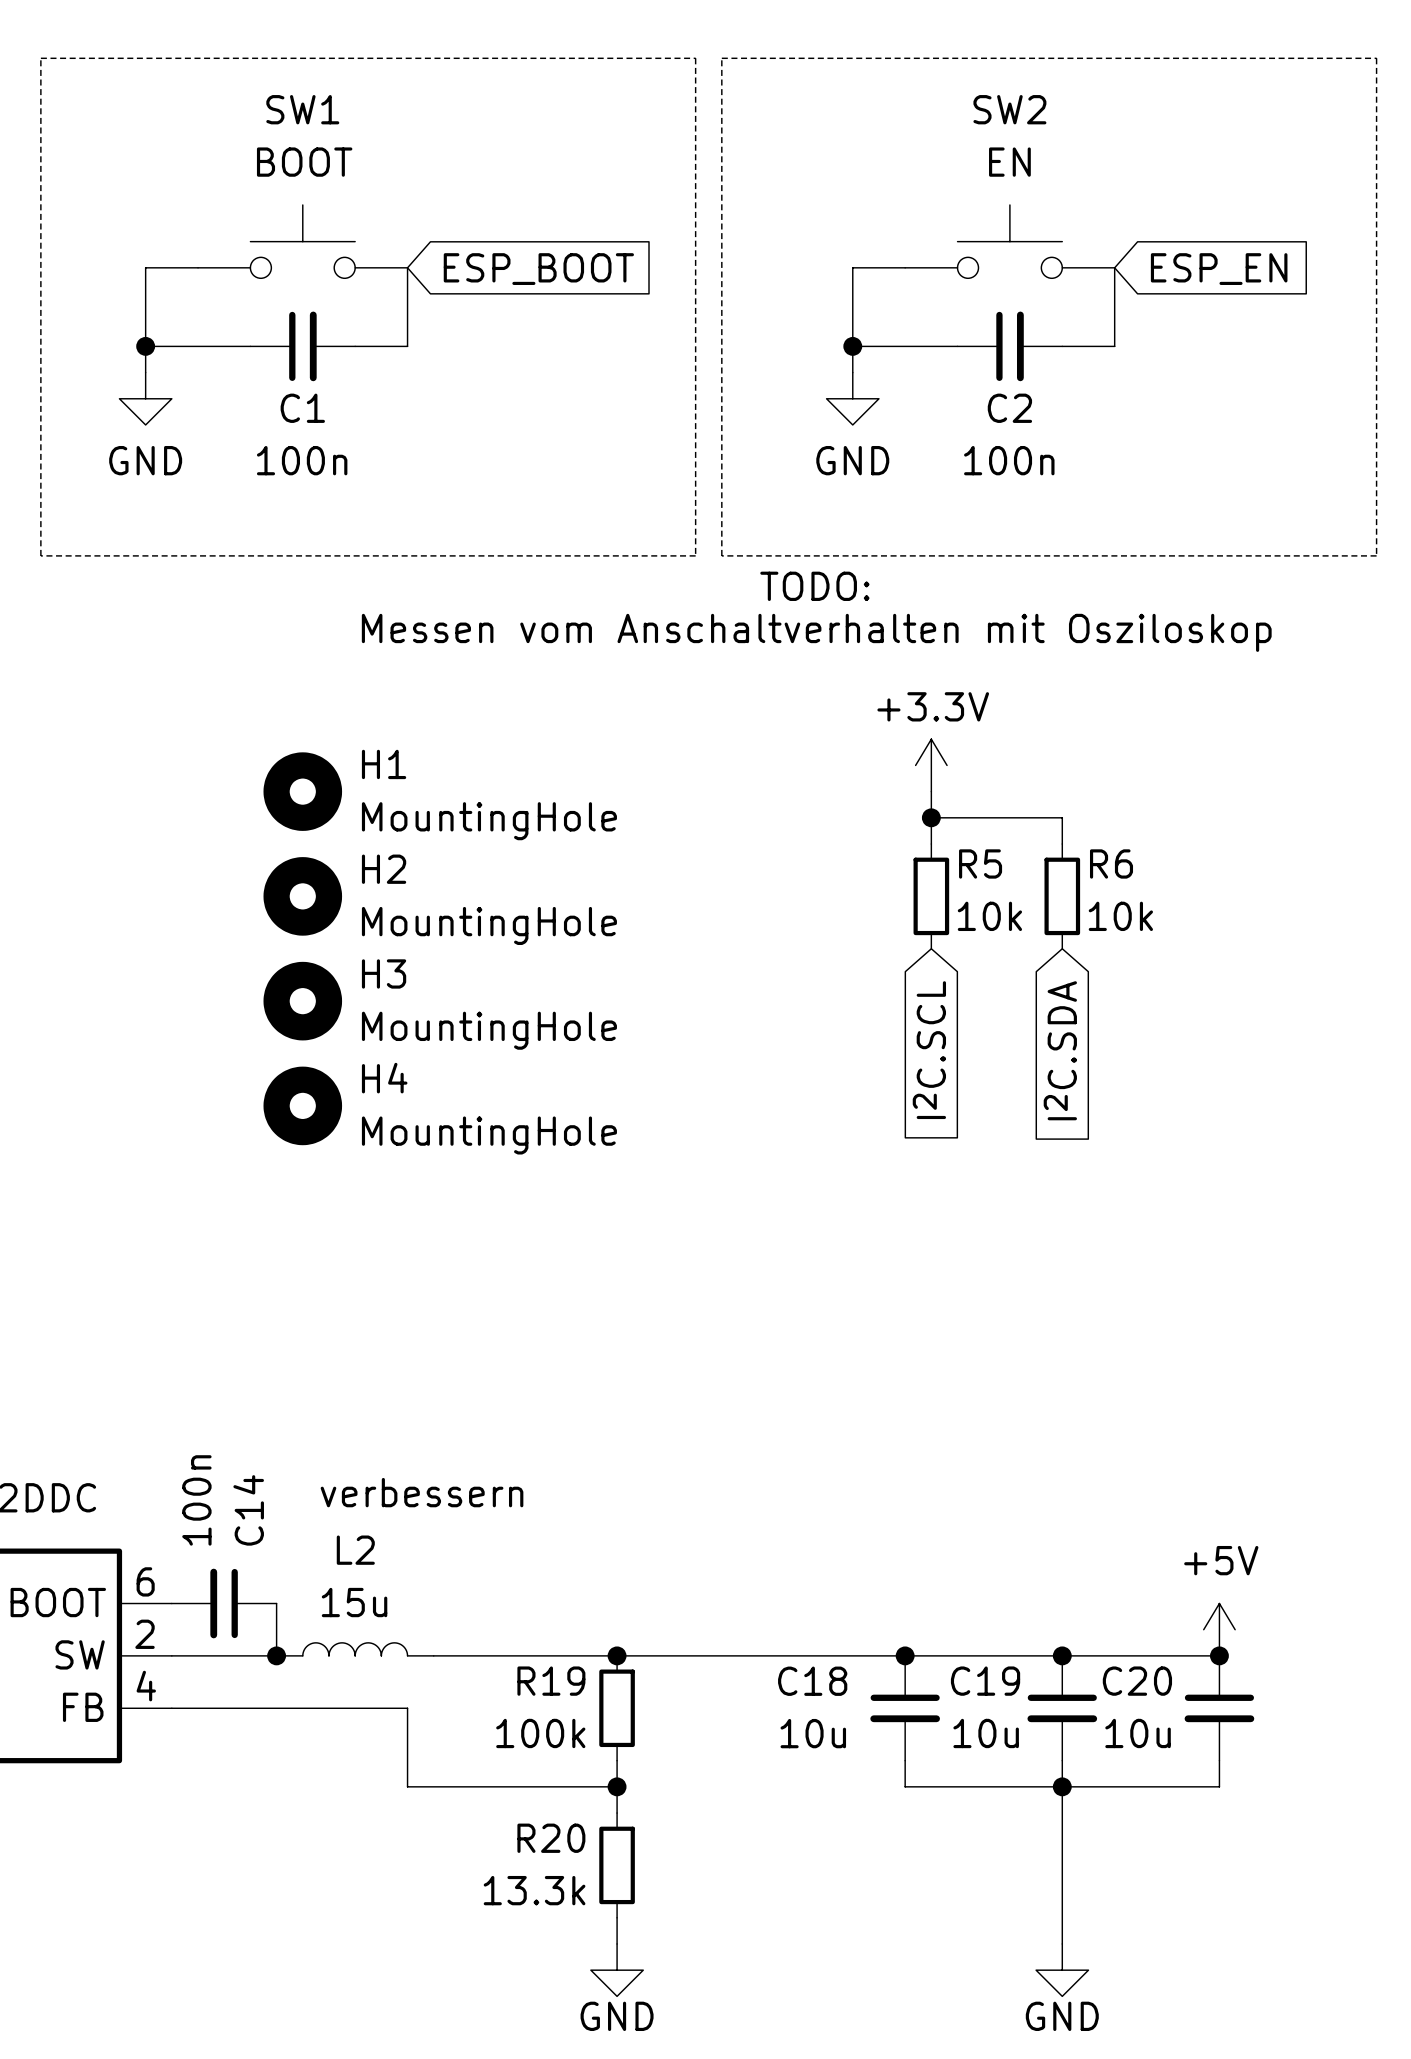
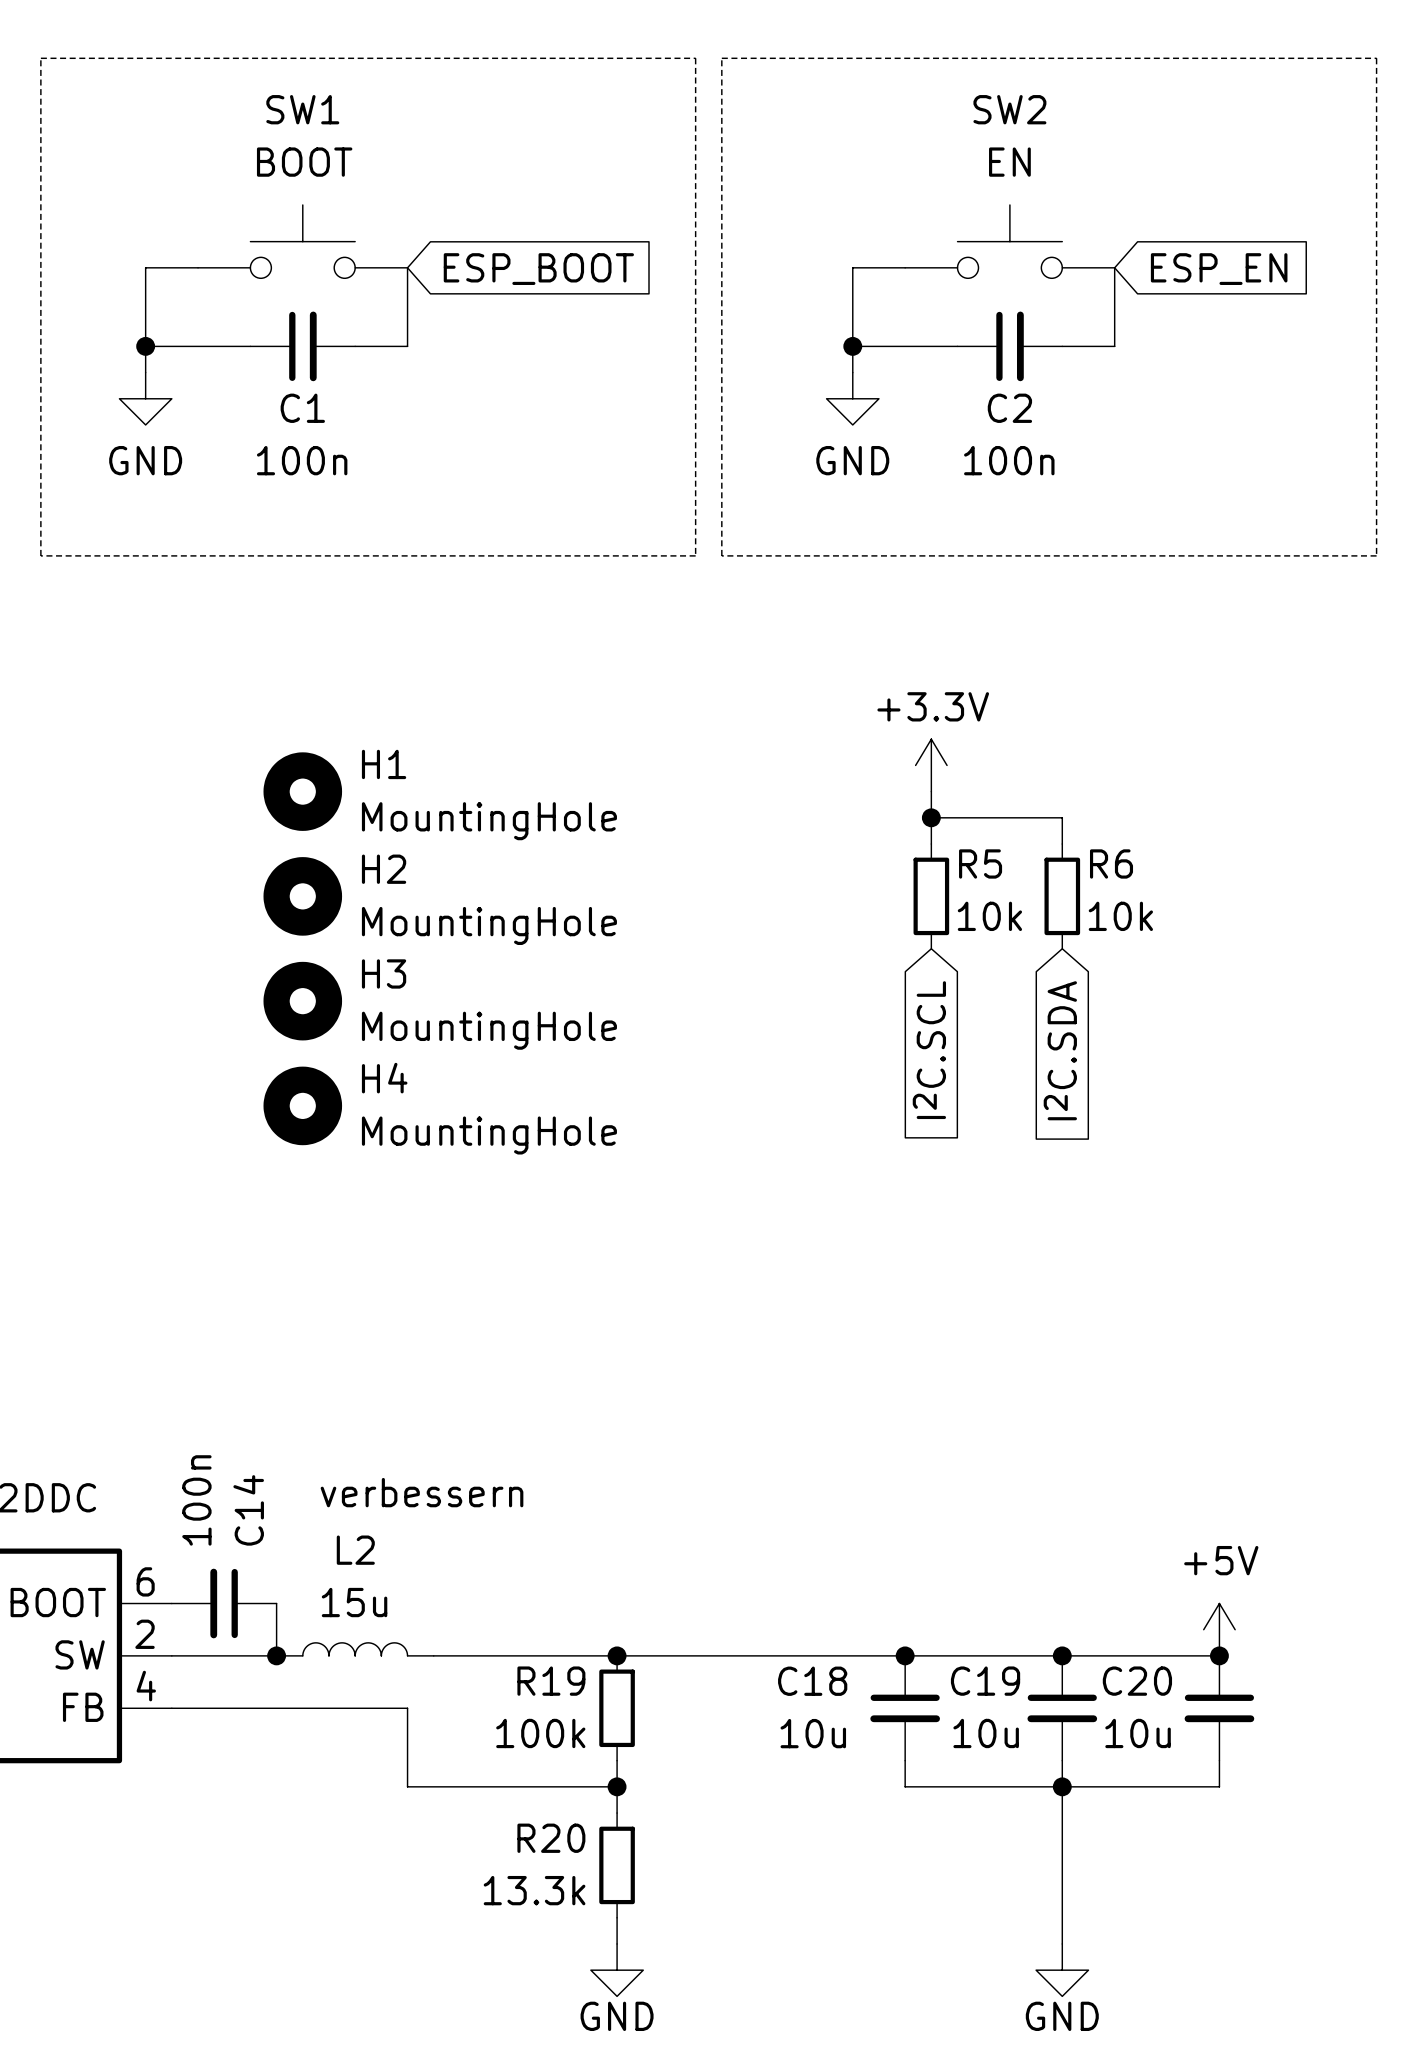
text: TODO: (814, 586) -> none
text: Messen vom Anschaltverhalten mit Osziloskop (816, 632) -> none

